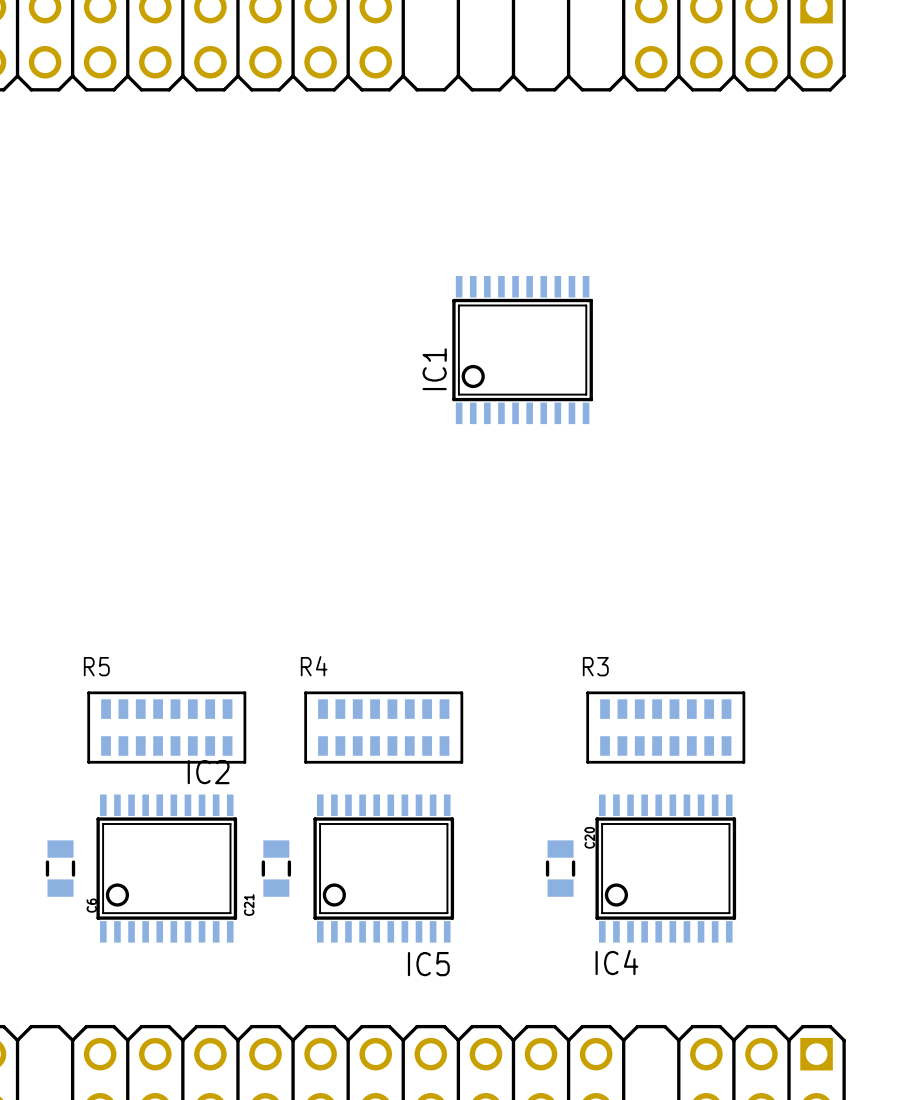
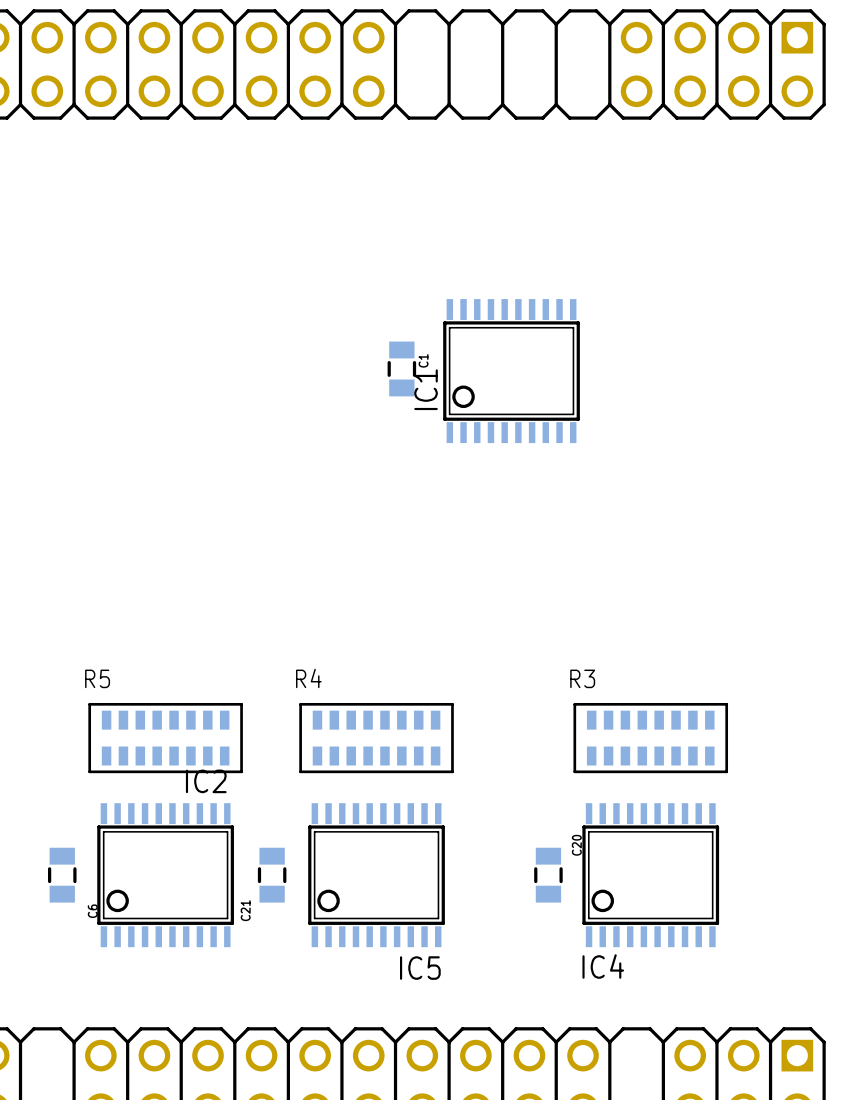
C1: none -> (401, 368)

